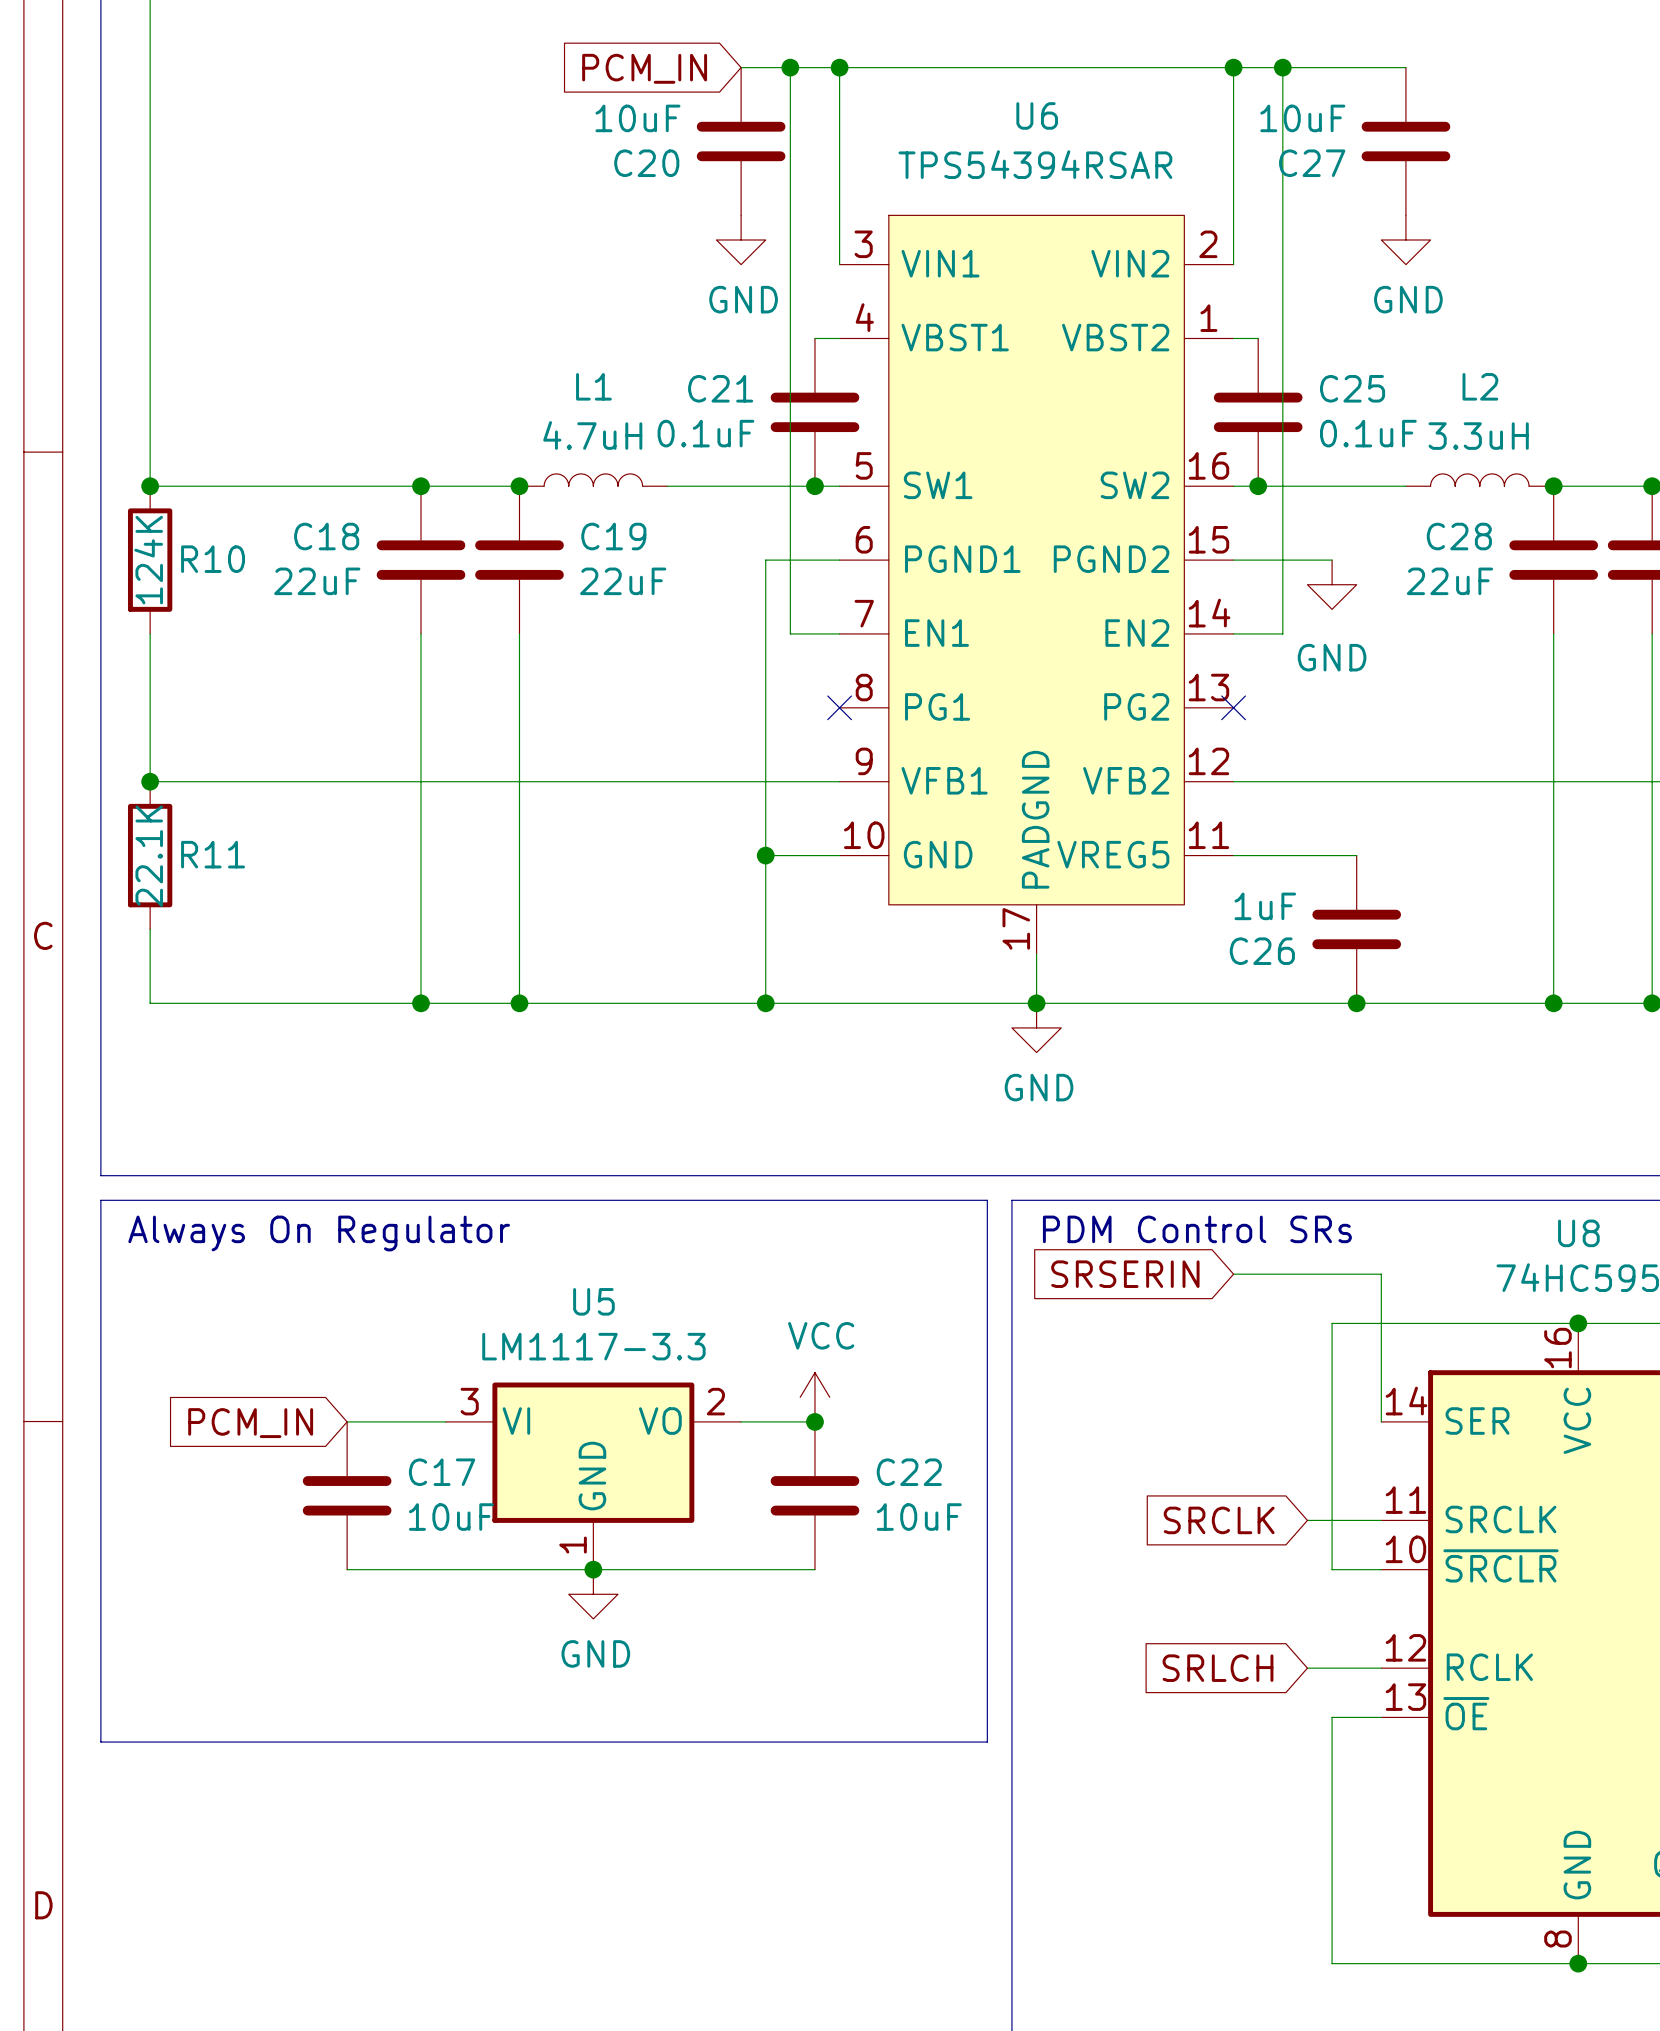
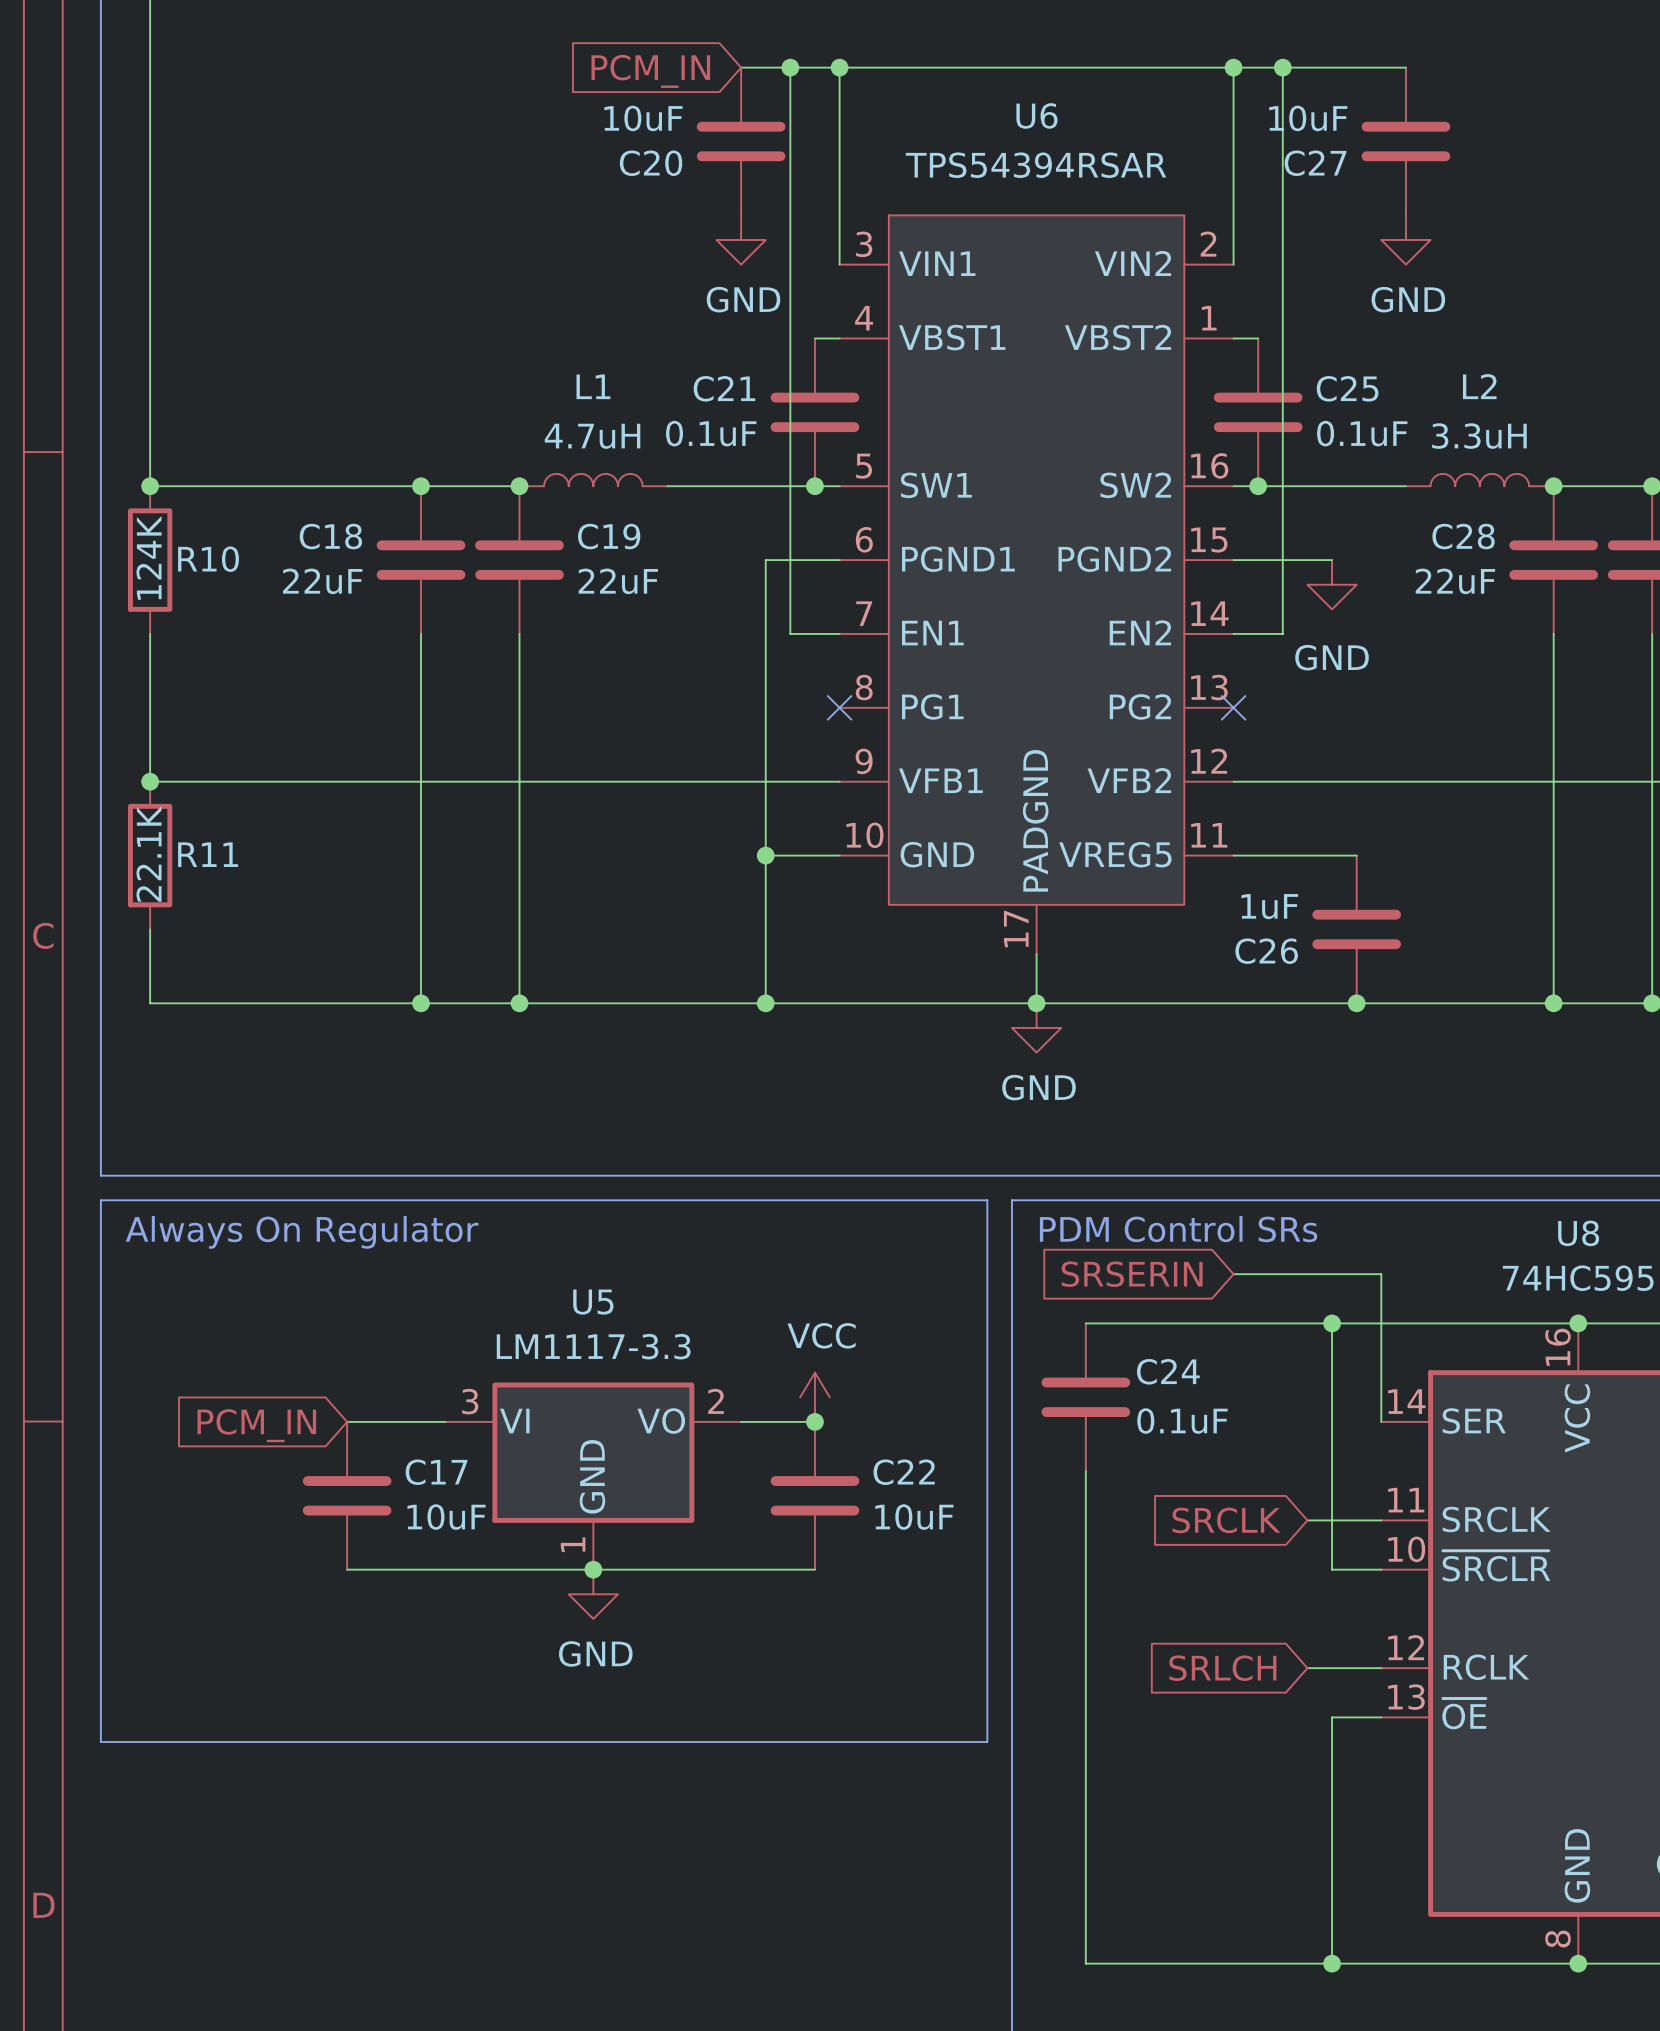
wire: none -> (1085, 1323) (1332, 1323)
junction: none -> (1332, 1323)
C24: none -> 0.1uF (1085, 1397)
wire: none -> (1085, 1471) (1085, 1963) (1332, 1963)
junction: none -> (1332, 1963)

